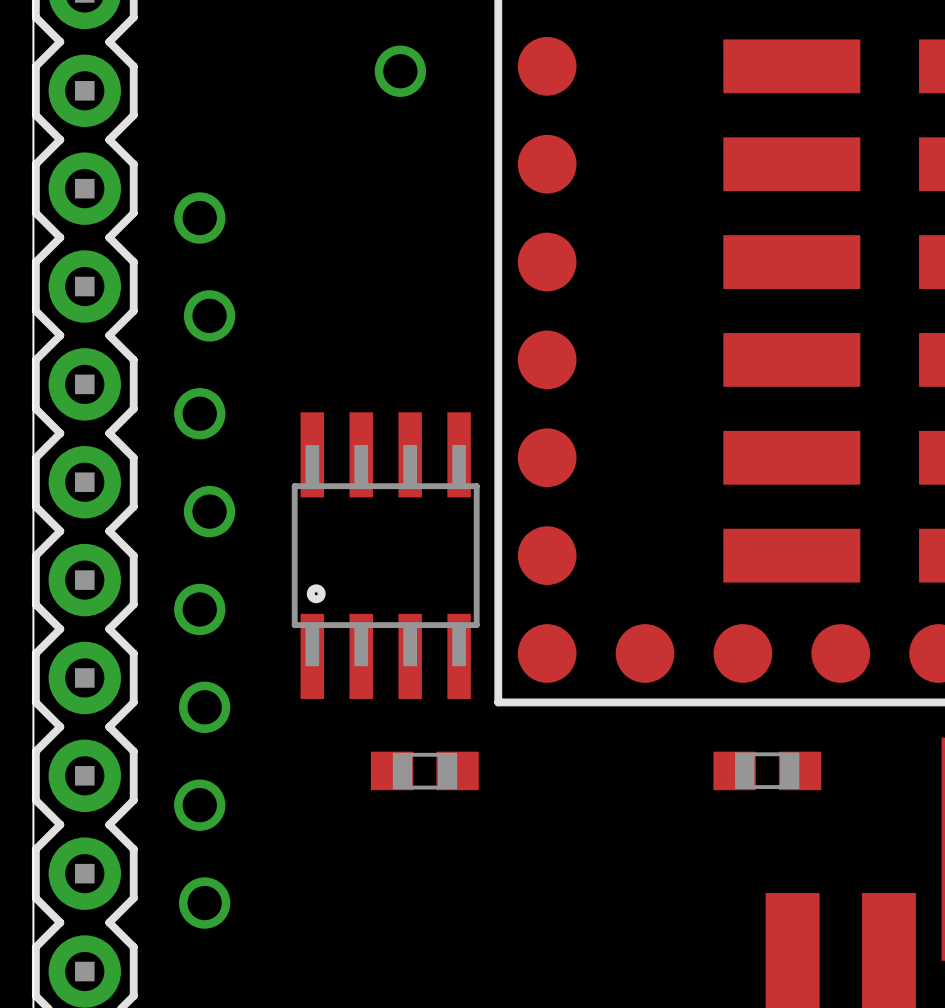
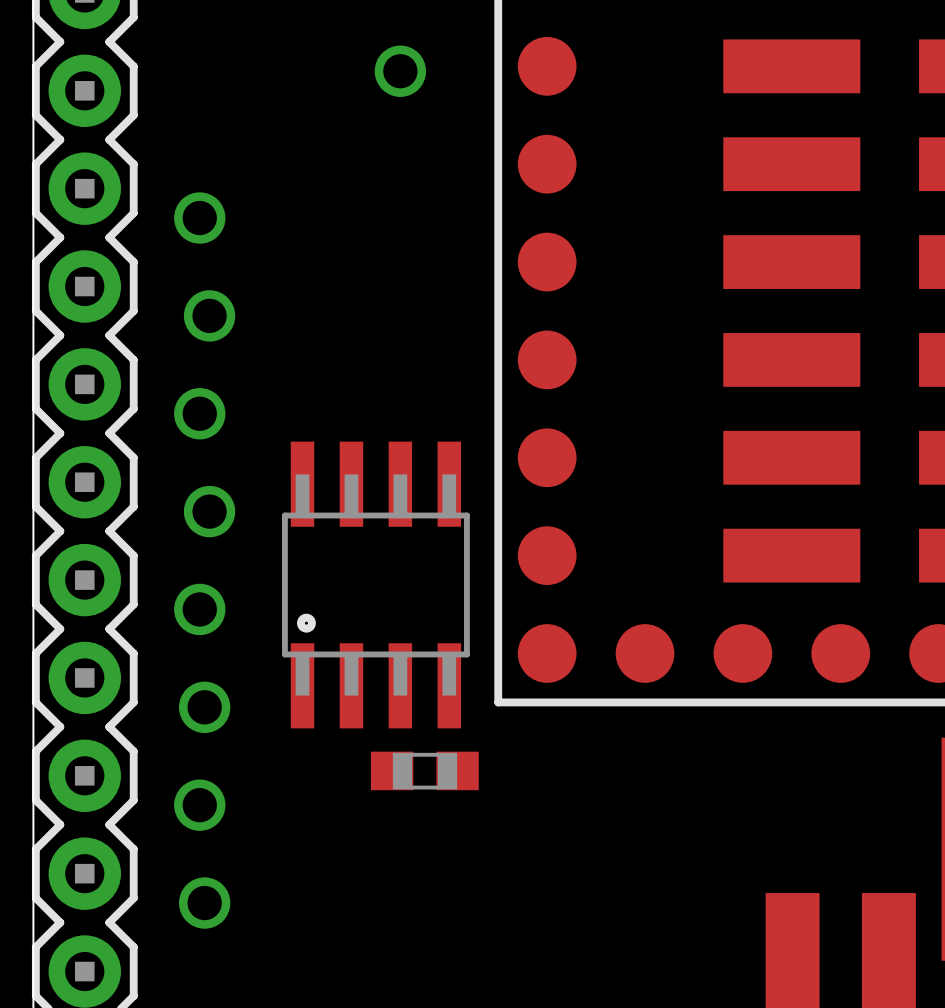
part position: (385, 555) -> (375, 584)
part: (767, 770) -> none

